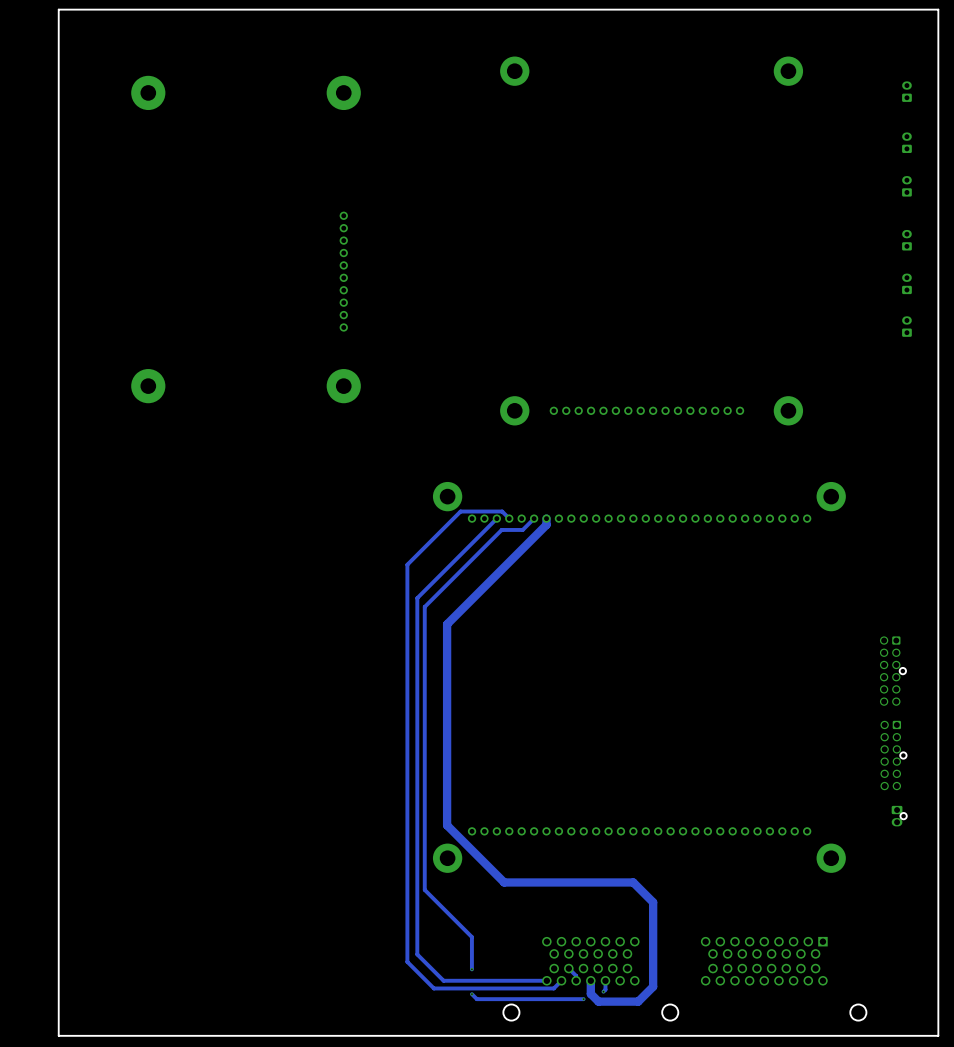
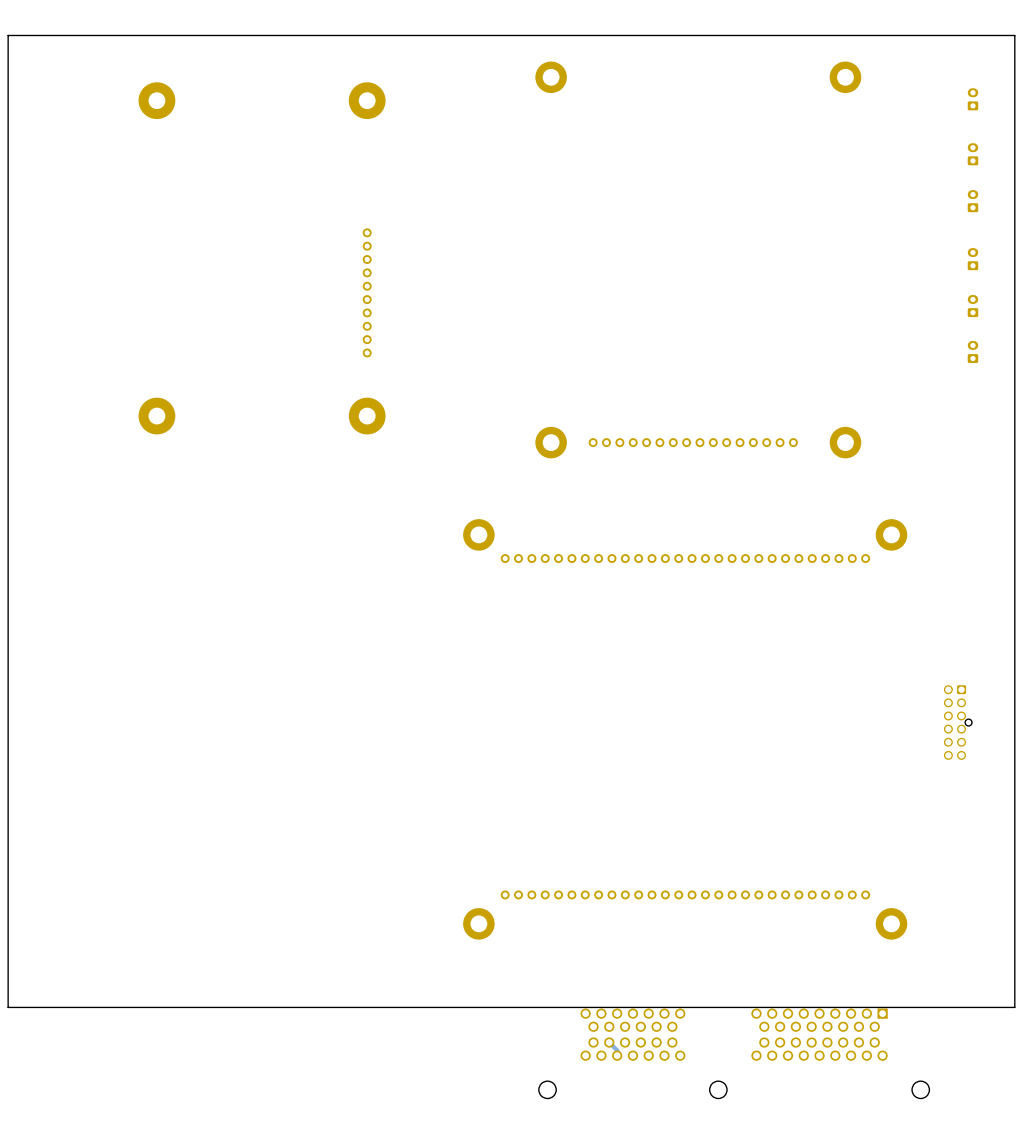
board edge: (938, 9) (58, 9) (58, 1035) (938, 1035) (938, 9) -> (1014, 35) (1014, 1007) (8, 1007) (8, 35) (1014, 35)
track: (496, 518) (417, 598) (417, 954) (443, 980) (546, 980) -> none
track: (509, 518) (502, 511) (460, 511) (407, 564) (407, 961) (433, 988) (553, 988) (561, 980) -> none
track: (534, 518) (522, 529) (501, 529) (424, 606) (424, 889) (471, 937) (471, 969) -> none
track: (546, 518) (546, 524) (447, 624) (447, 825) (504, 882) (633, 882) (653, 902) (653, 986) (638, 1001) (598, 1001) (590, 993) (590, 980) -> none
part: (893, 755) -> none
part: (899, 816) -> none
via: (471, 969) -> none
track: (605, 980) (605, 989) (603, 991) -> none
via: (603, 991) -> none
track: (471, 994) (476, 999) (583, 999) -> none
via: (471, 994) -> none
via: (583, 999) -> none

